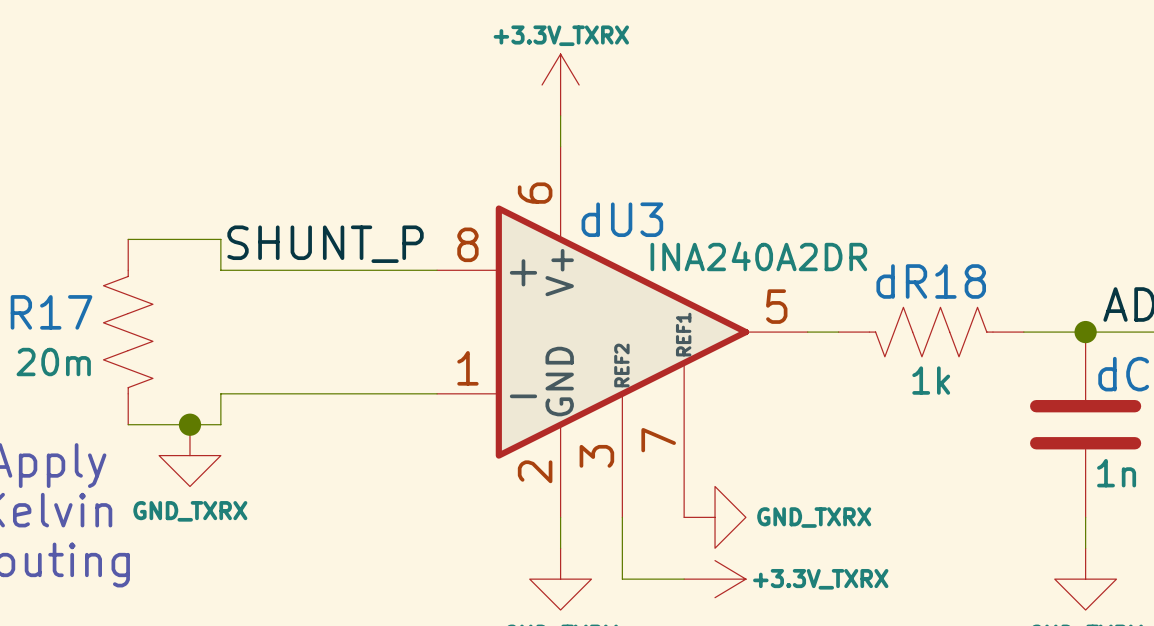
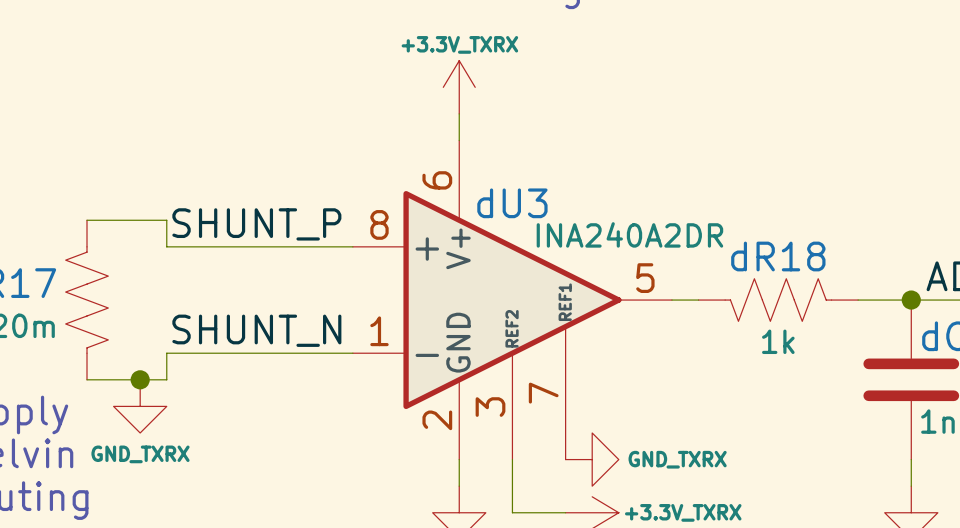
label: none -> SHUNT_N (256, 330)

